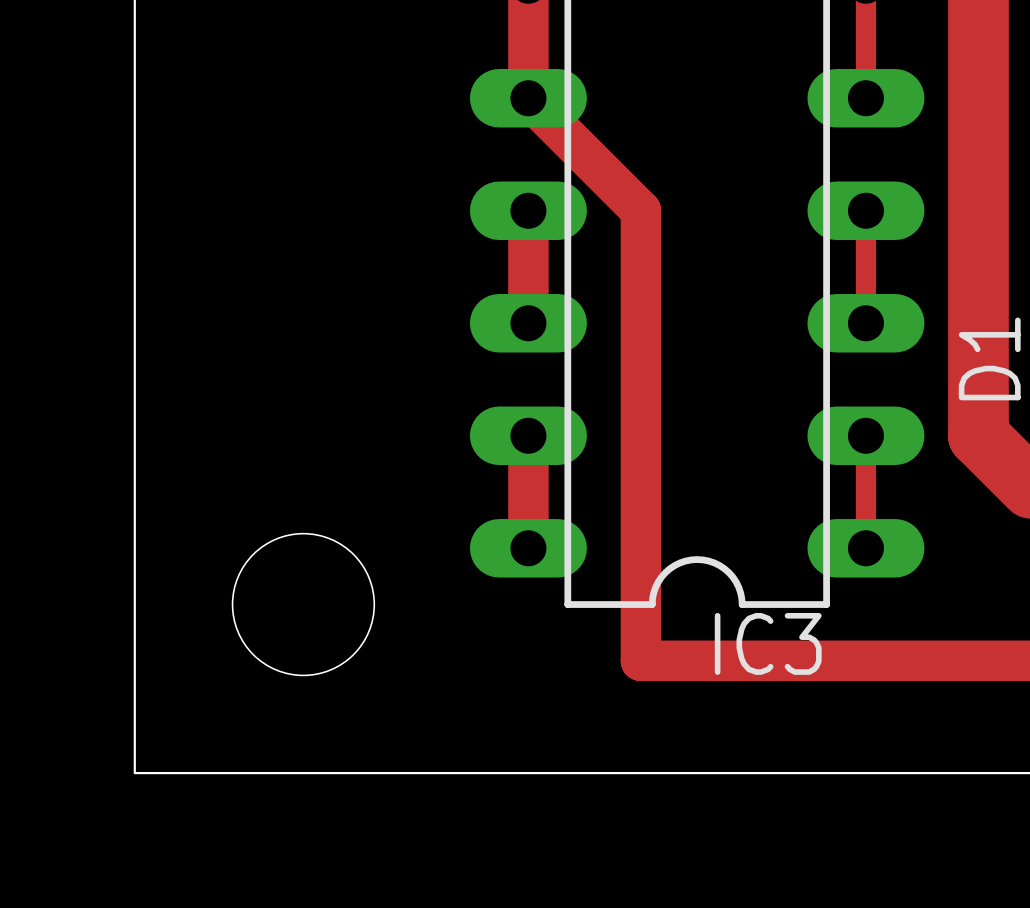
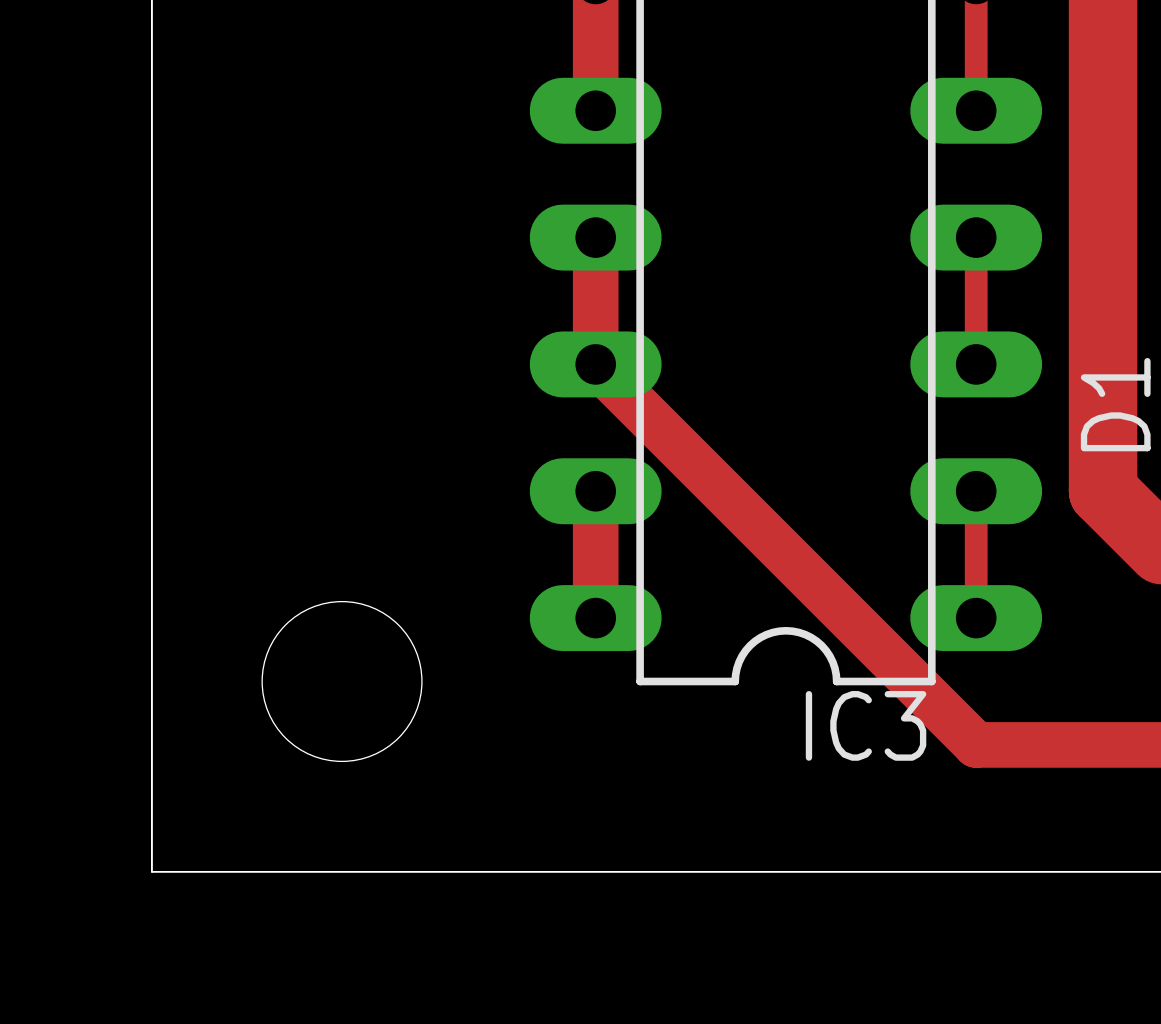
track: (528, 98) (640, 210) (640, 660) (865, 660) -> (595, 364) (976, 744)

